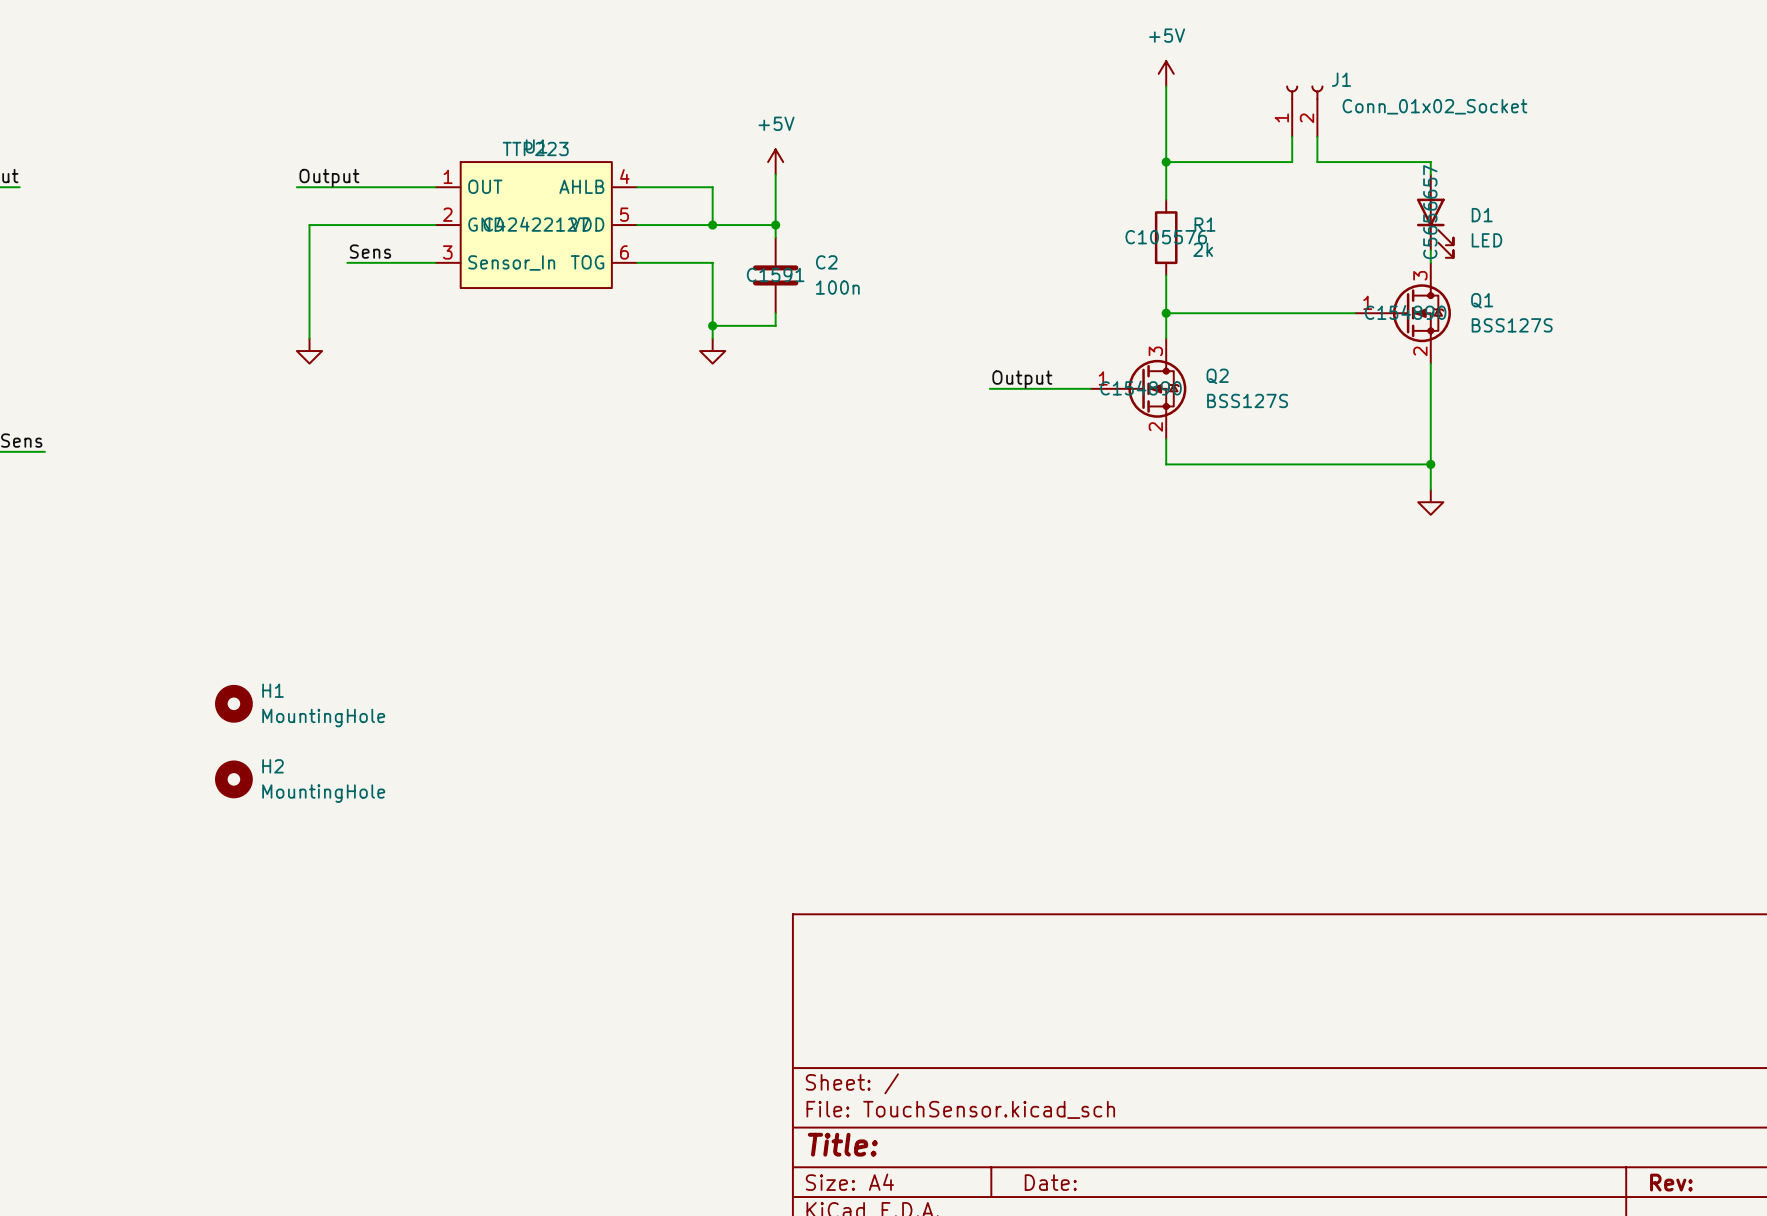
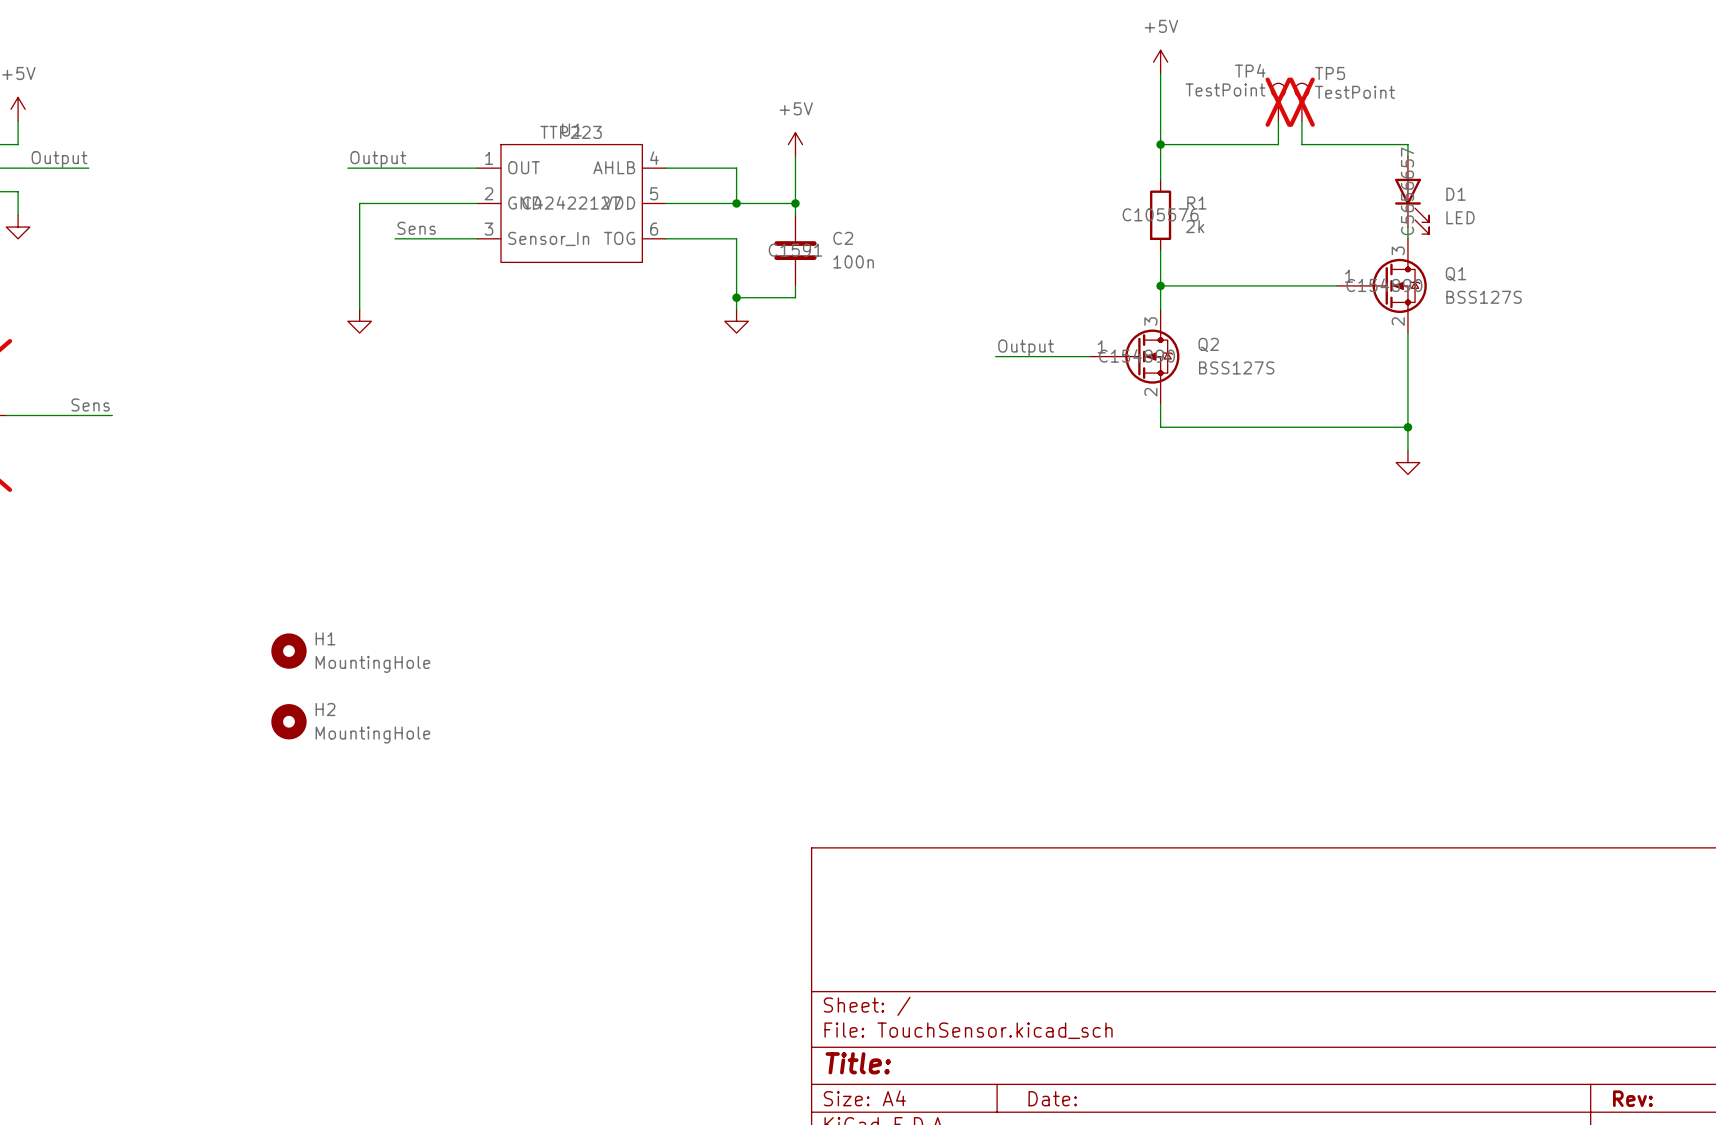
J1: Conn_01x02_Socket (1304, 111) -> none
TP4: none -> TestPoint (1278, 102)
TP5: none -> TestPoint (1301, 102)

